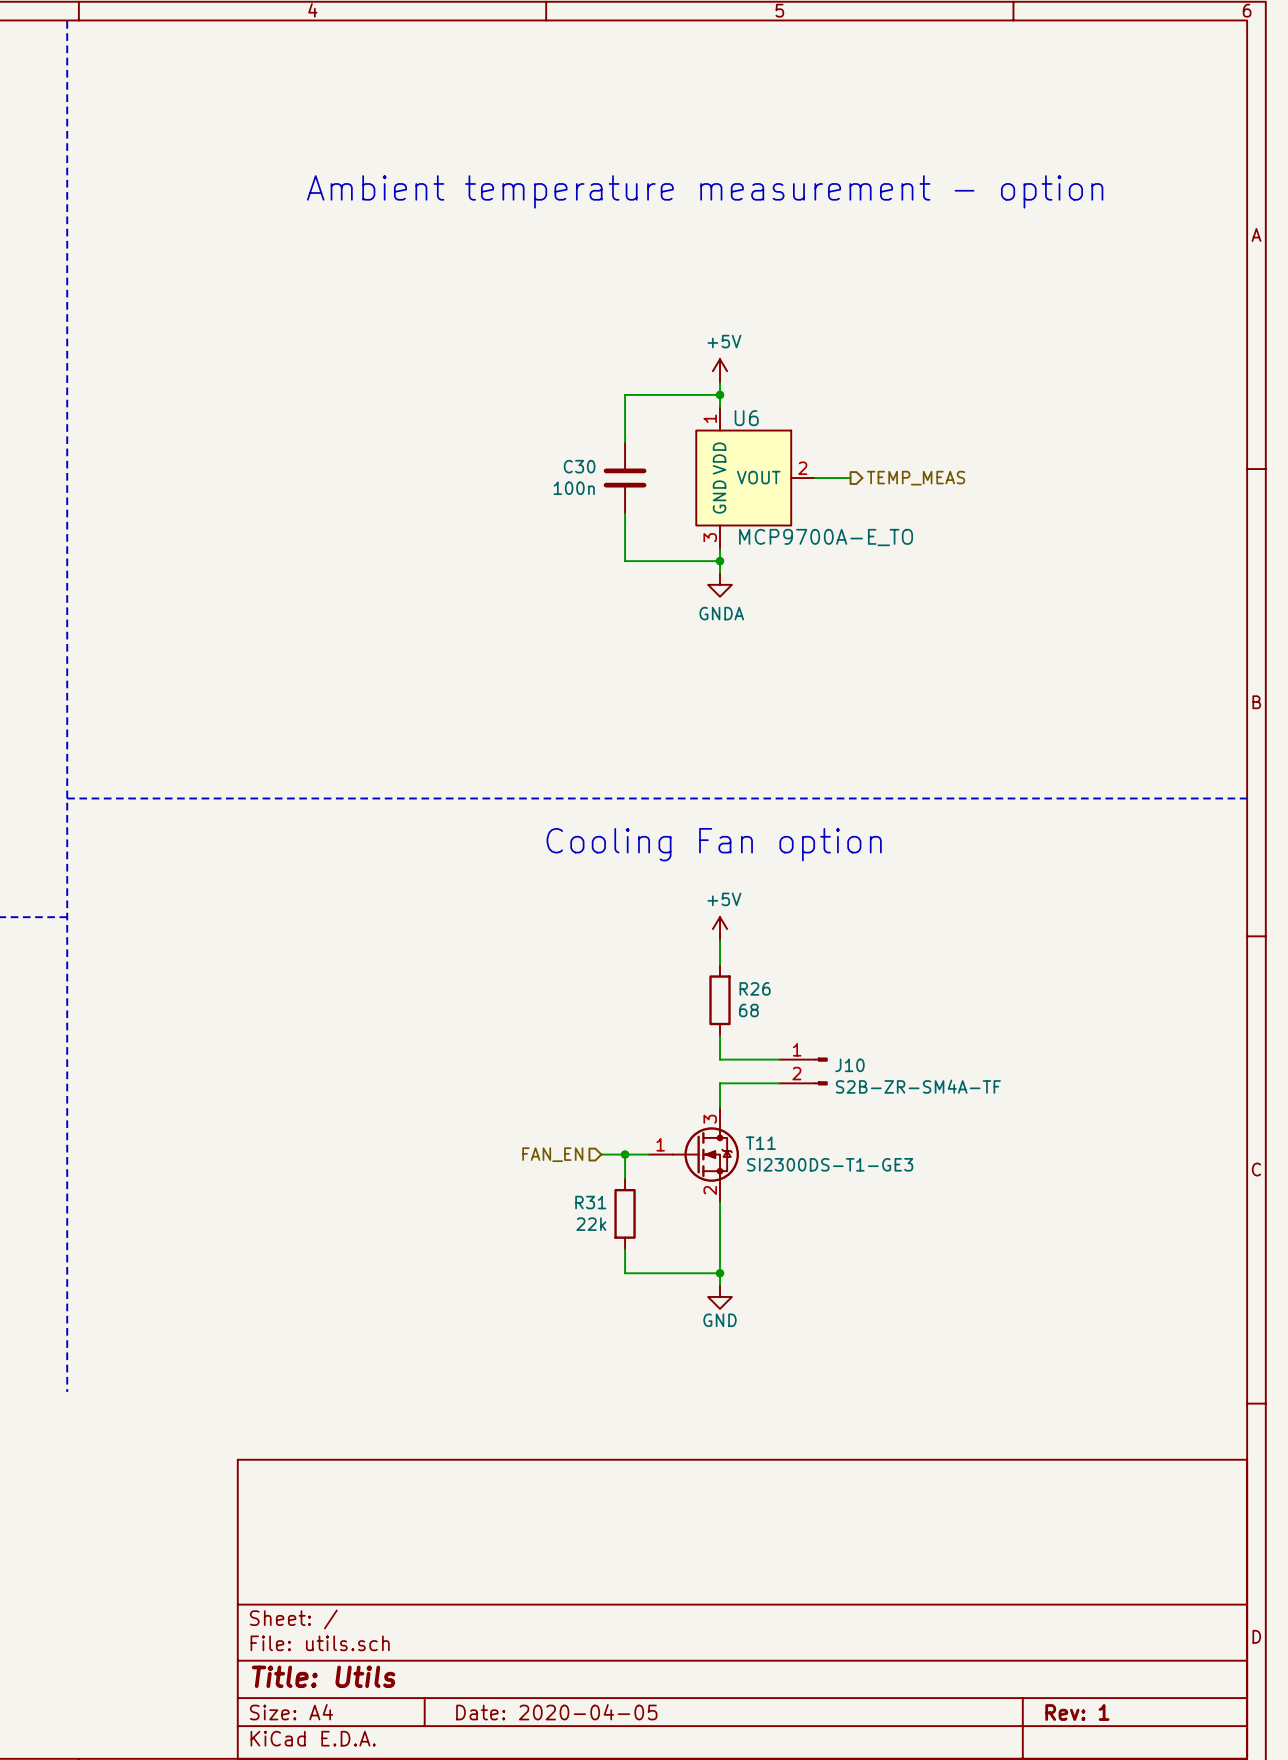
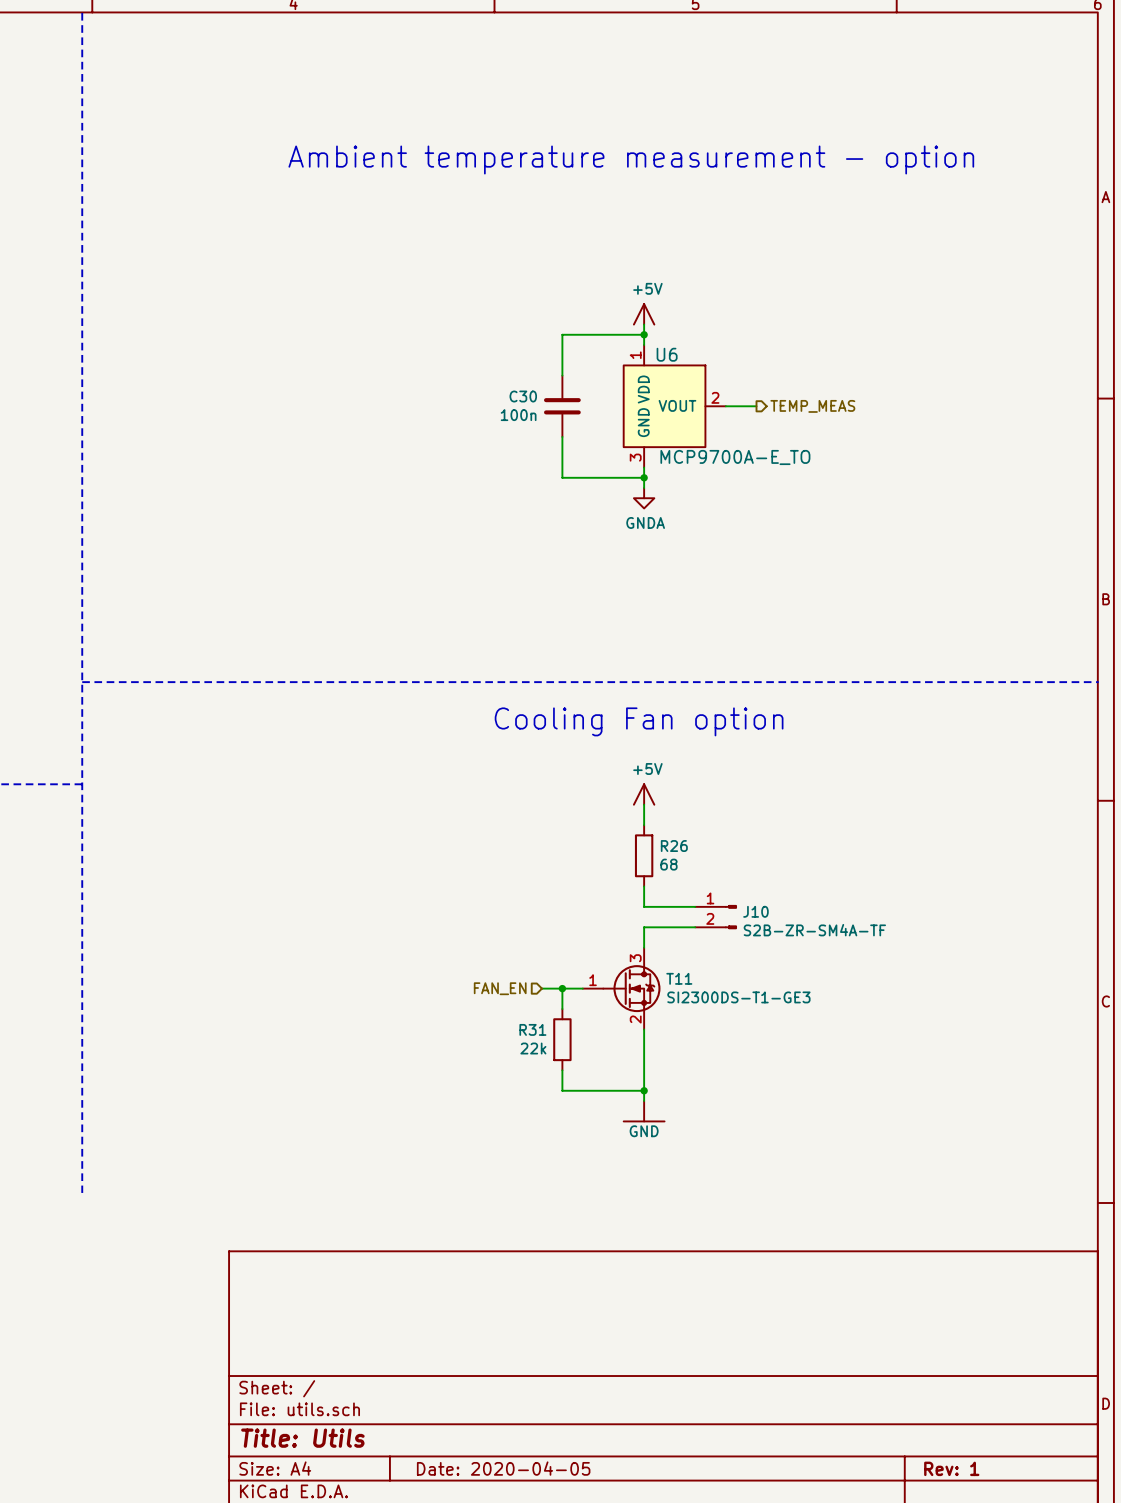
power symbol shape: [712, 359, 728, 384] -> [633, 304, 655, 325]
power symbol shape: [712, 917, 728, 941] -> [633, 784, 655, 805]
power symbol shape: [708, 1285, 732, 1309] -> [623, 1100, 665, 1122]

